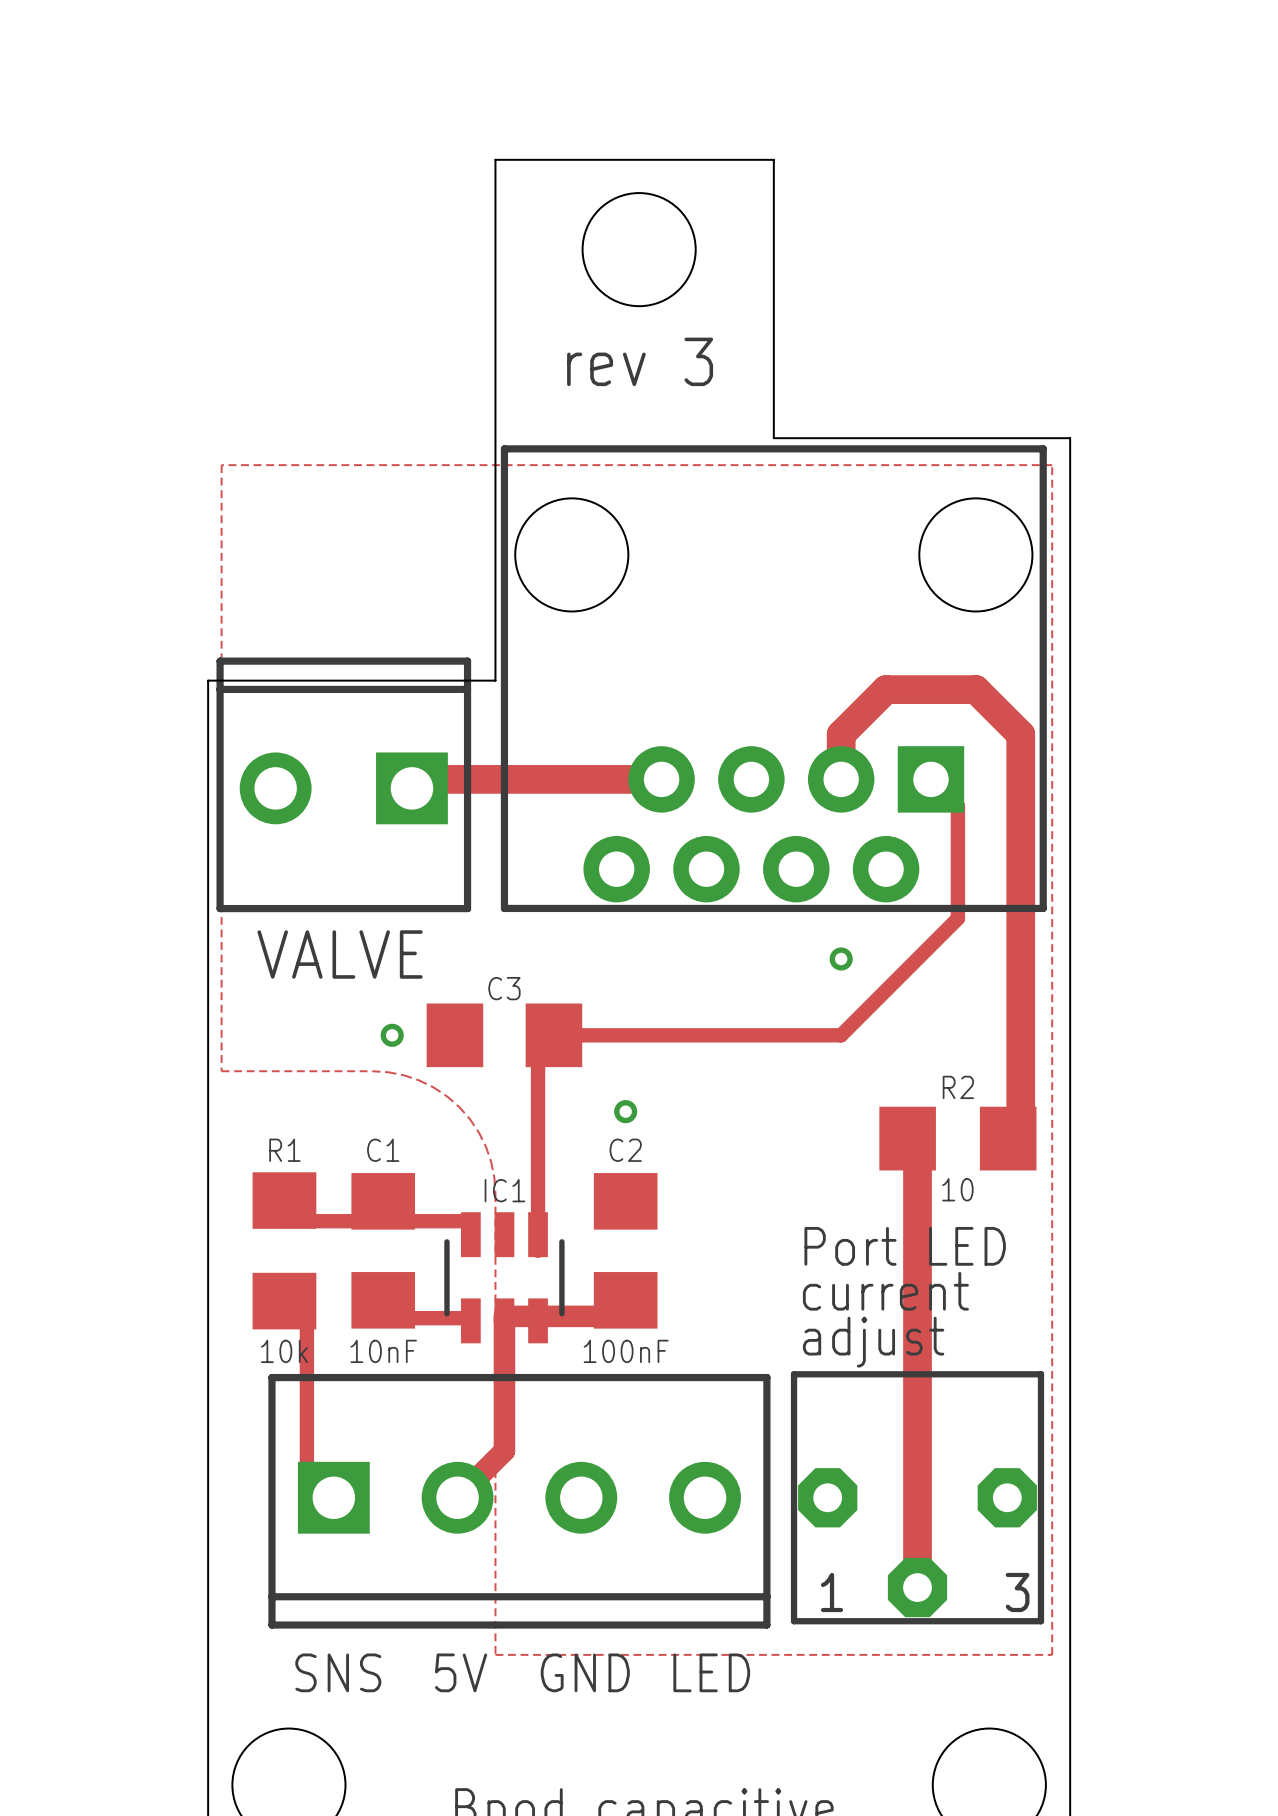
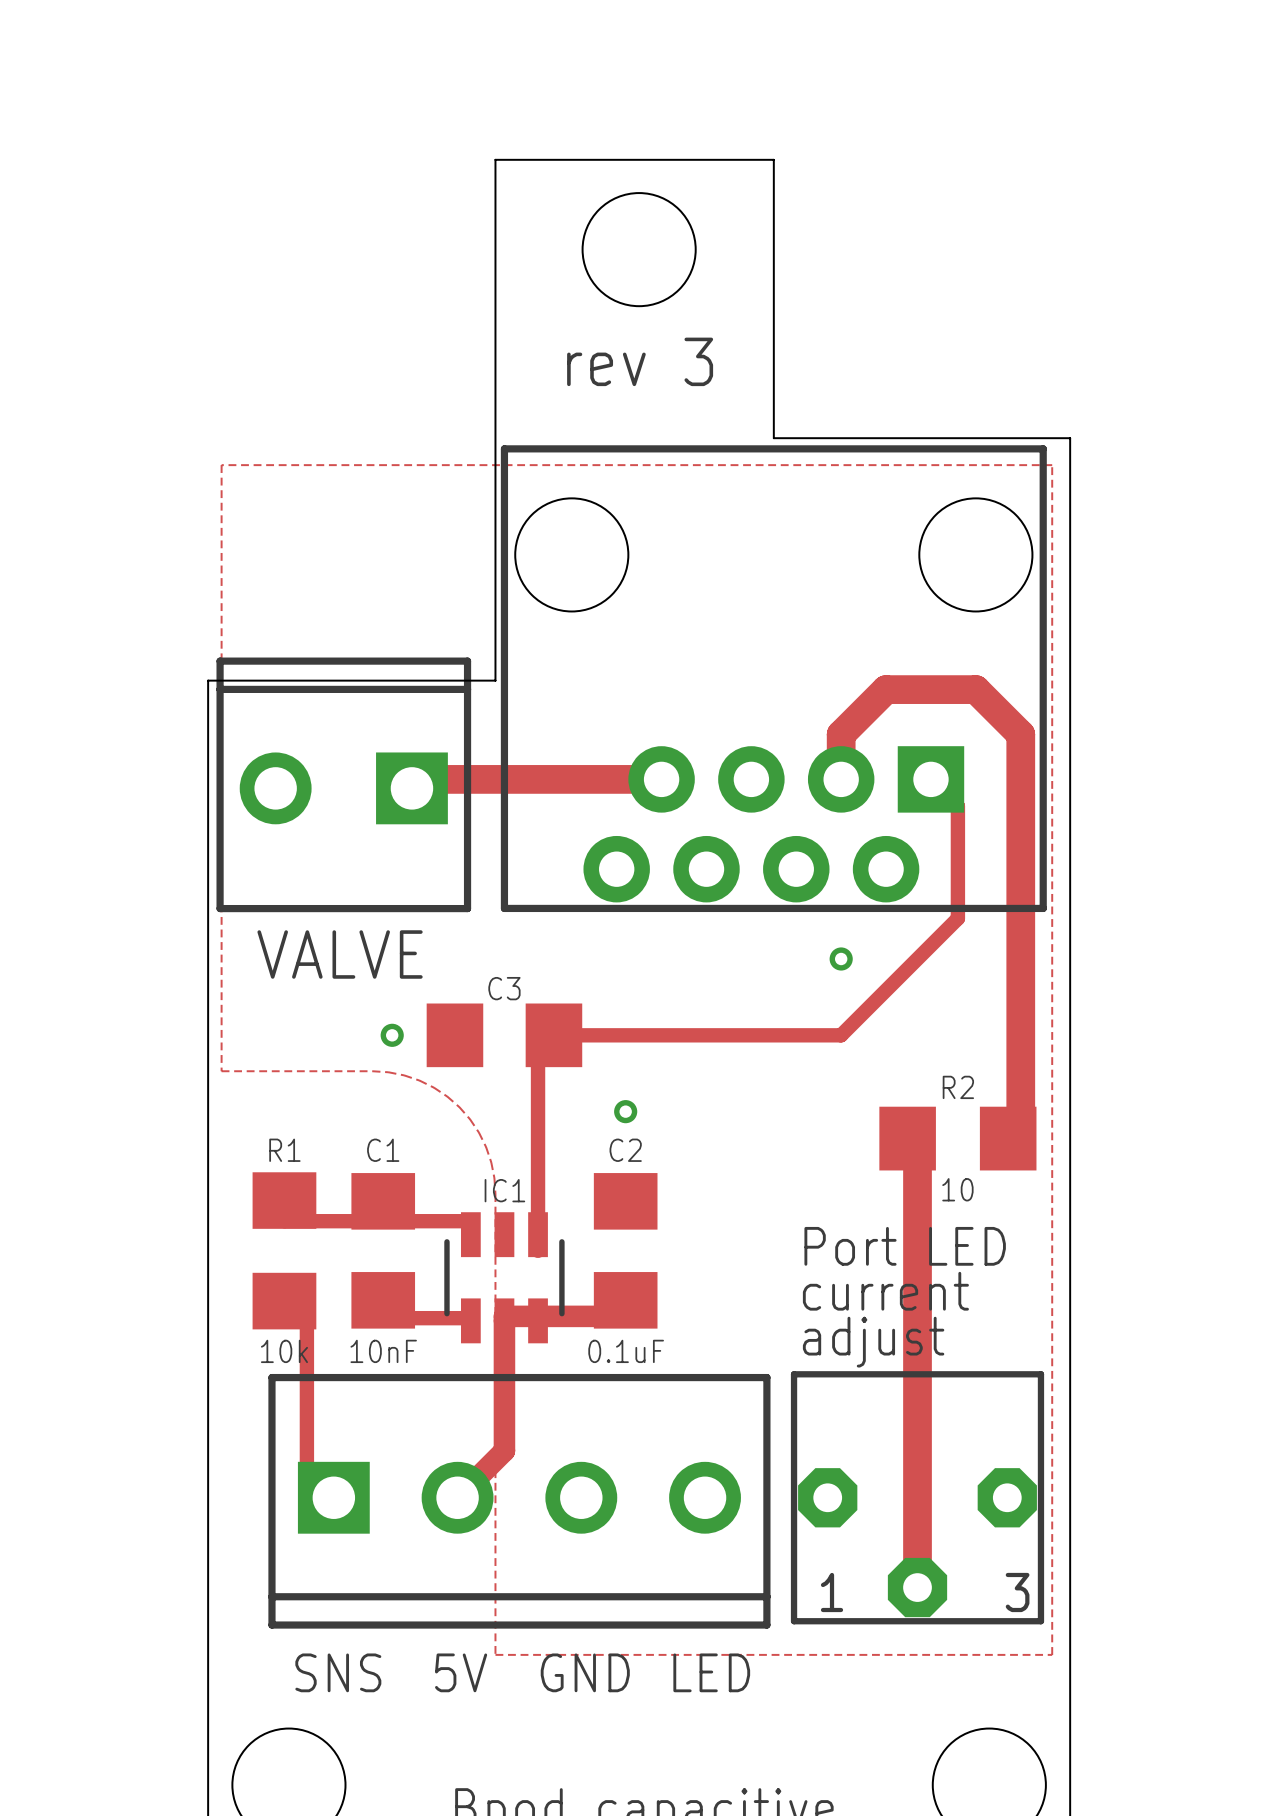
C2 value: 100nF (626, 1351) -> 0.1uF (626, 1351)

